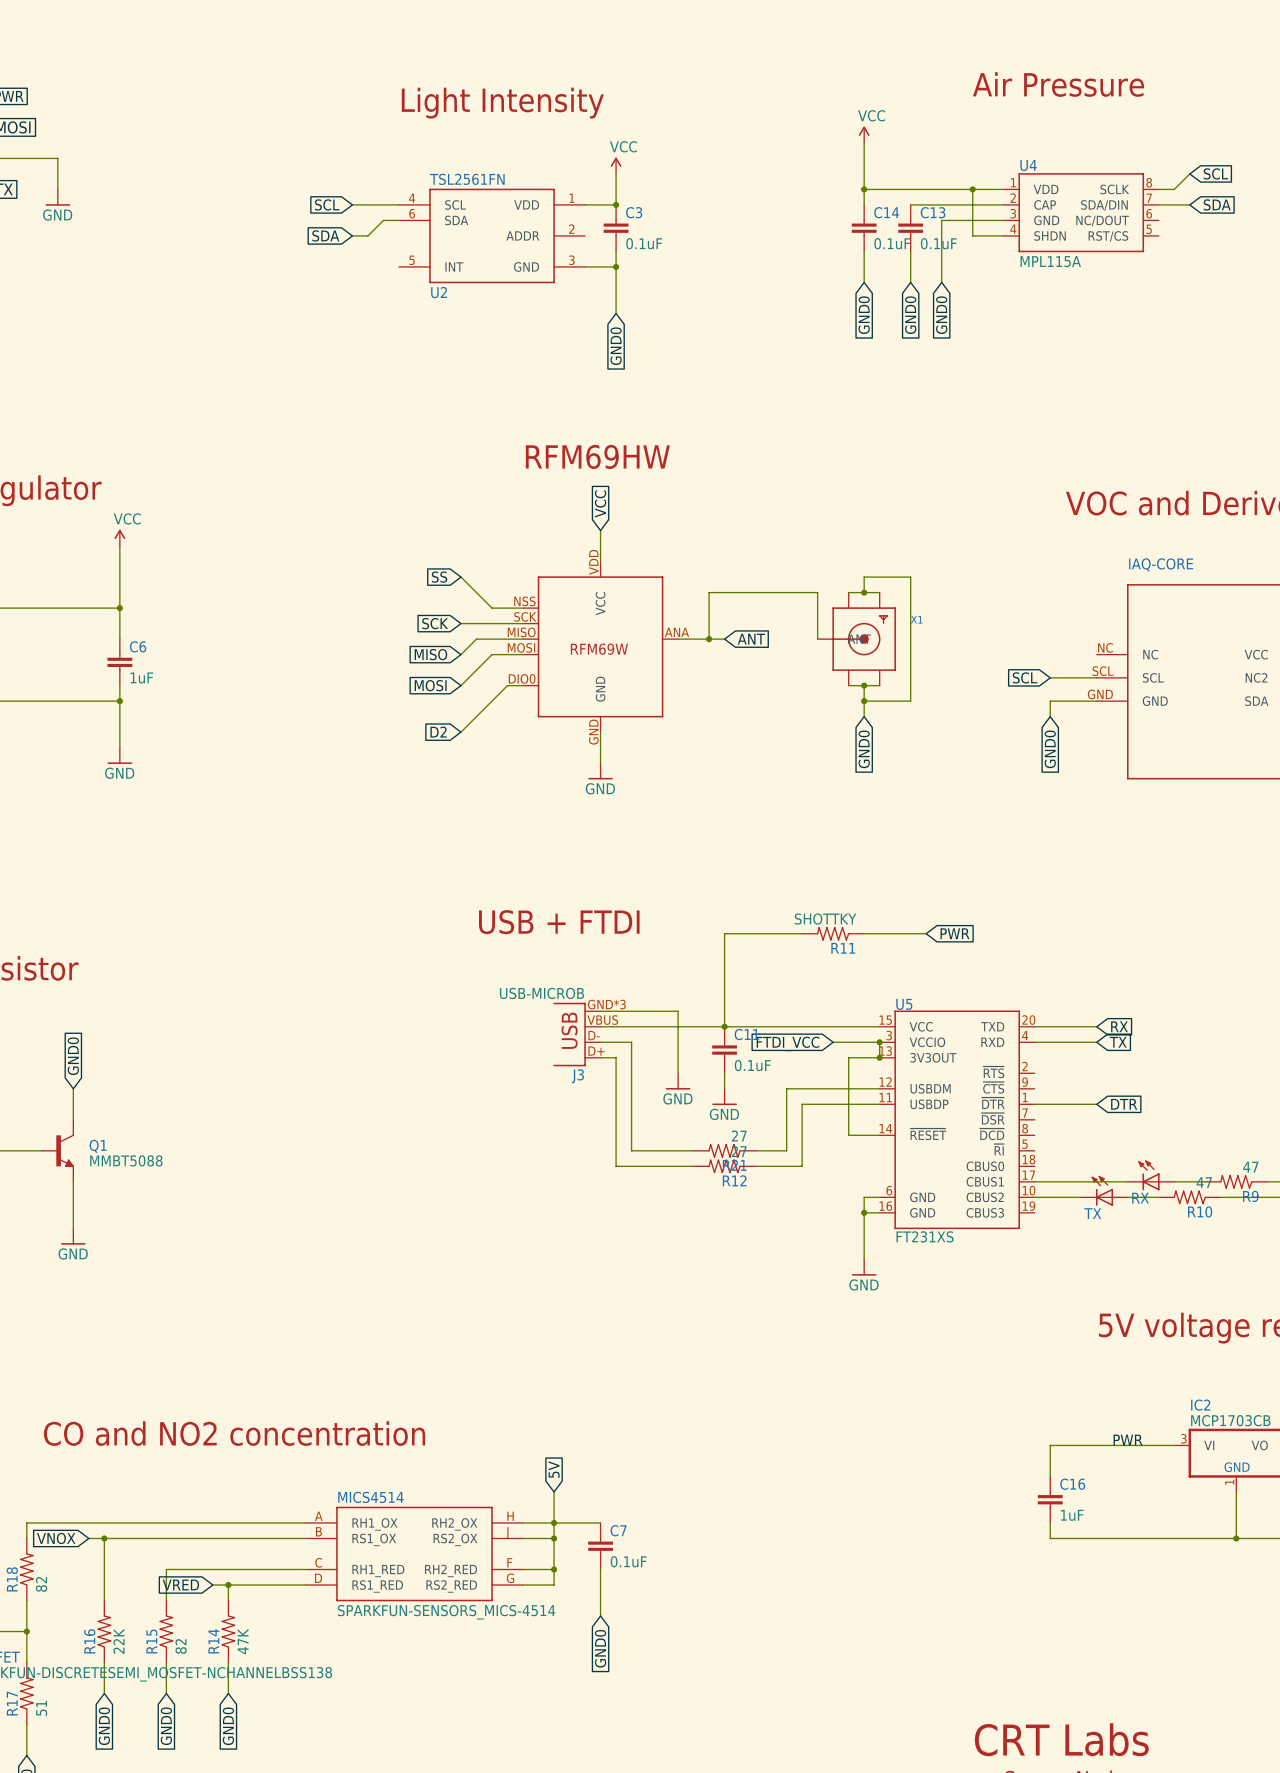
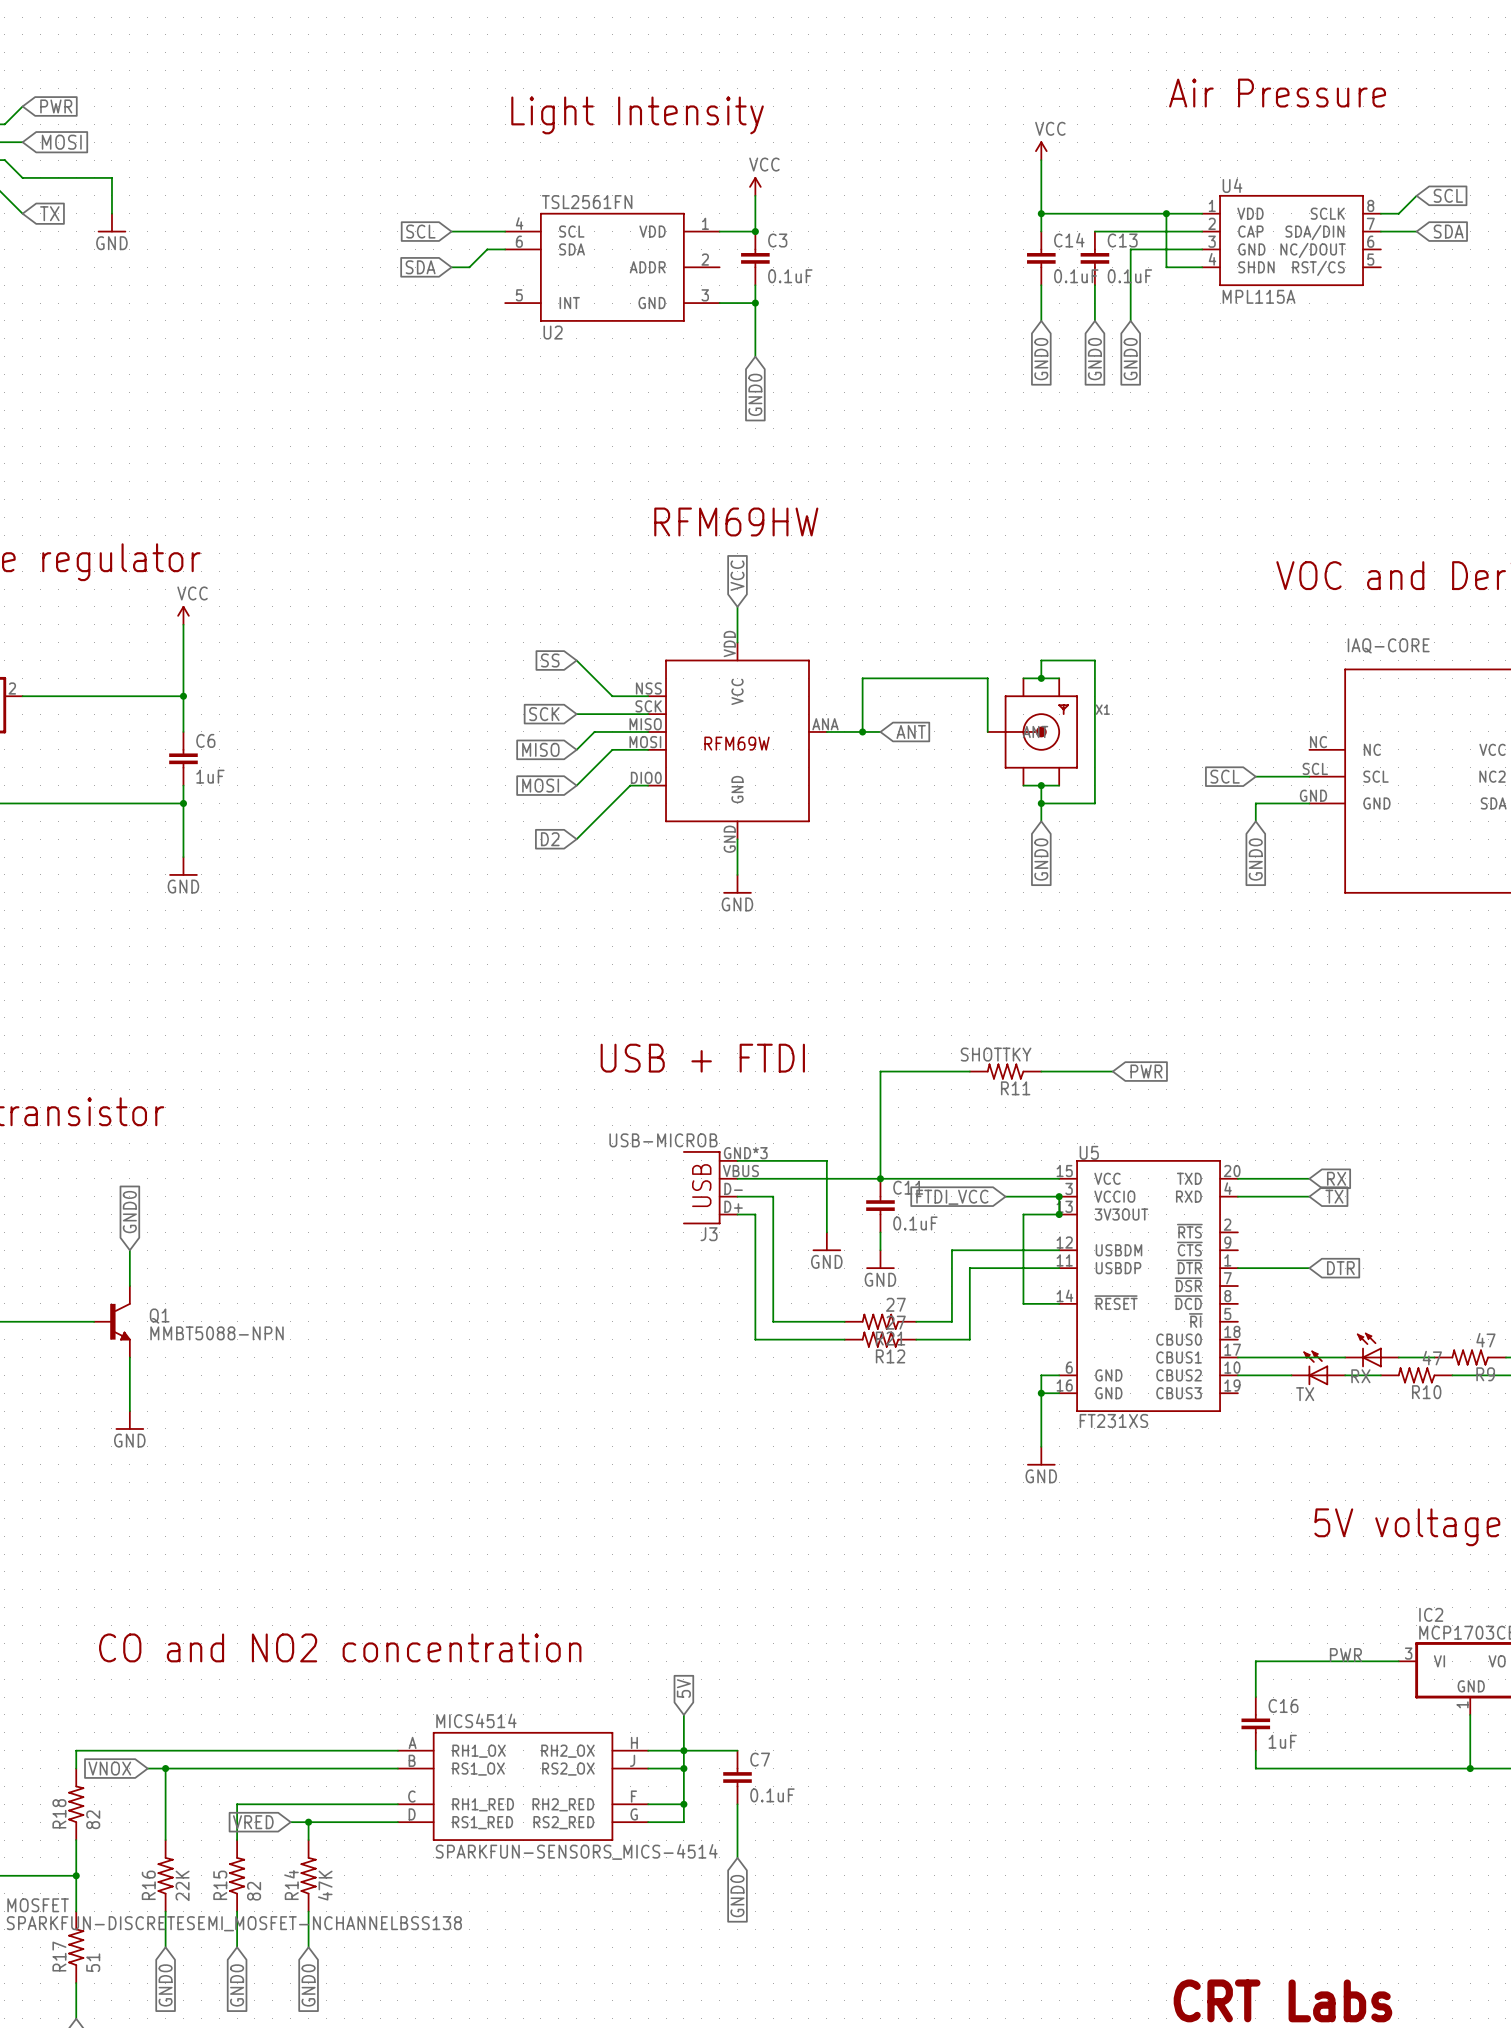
Q1 value: MMBT5088 (126, 1160) -> MMBT5088-NPN (217, 1333)

